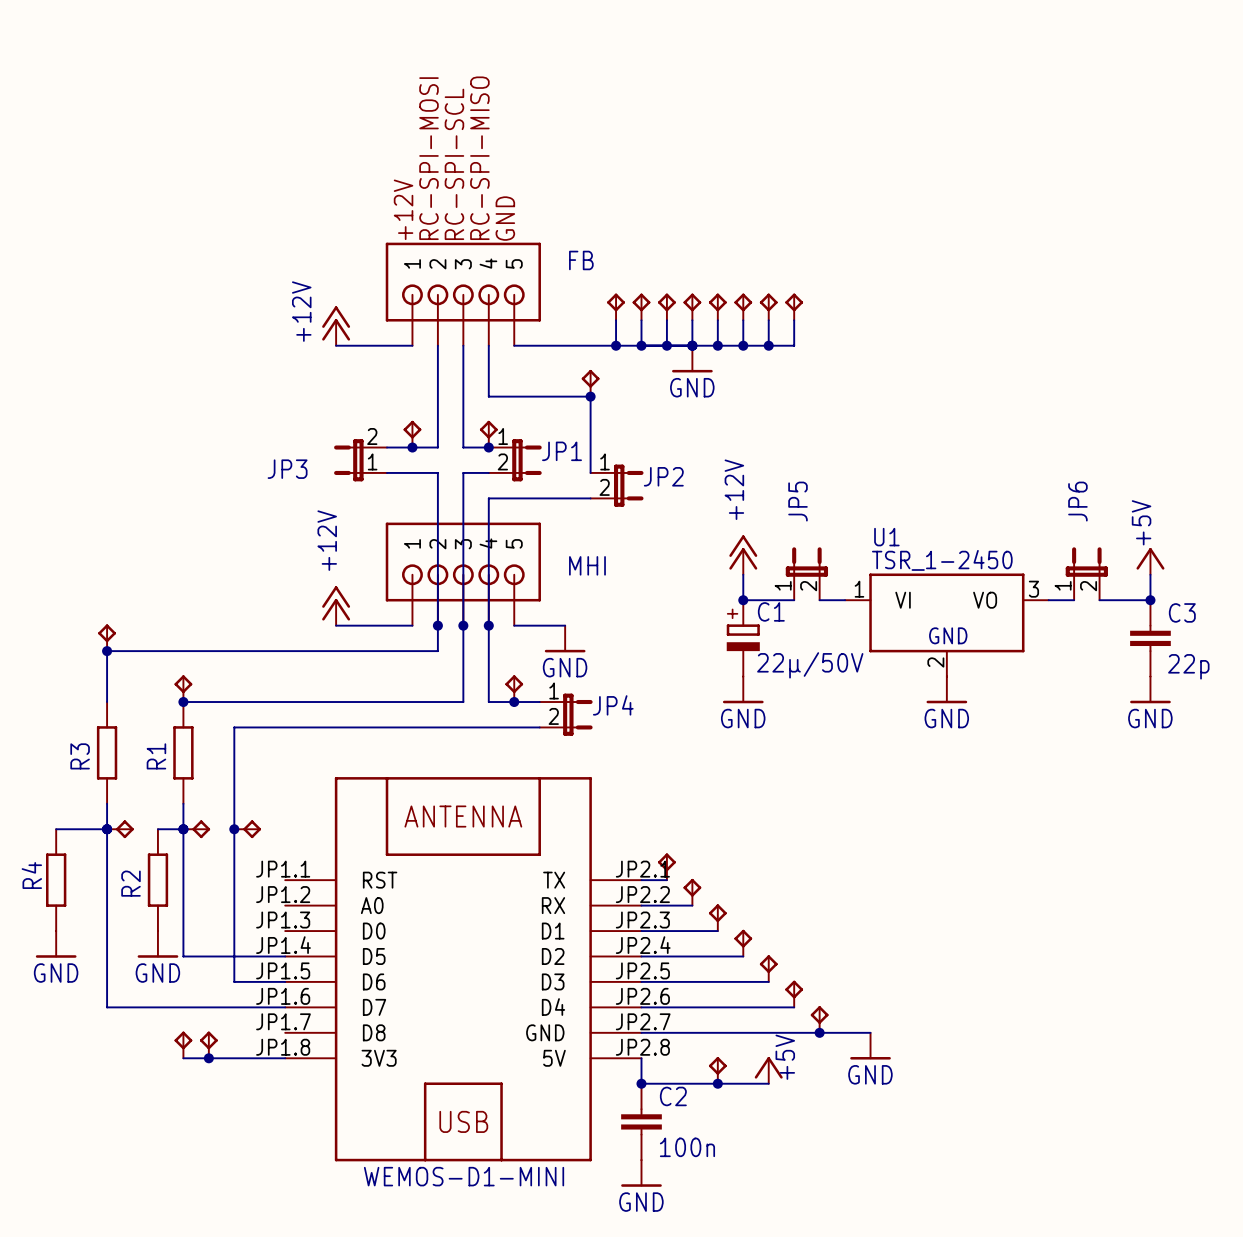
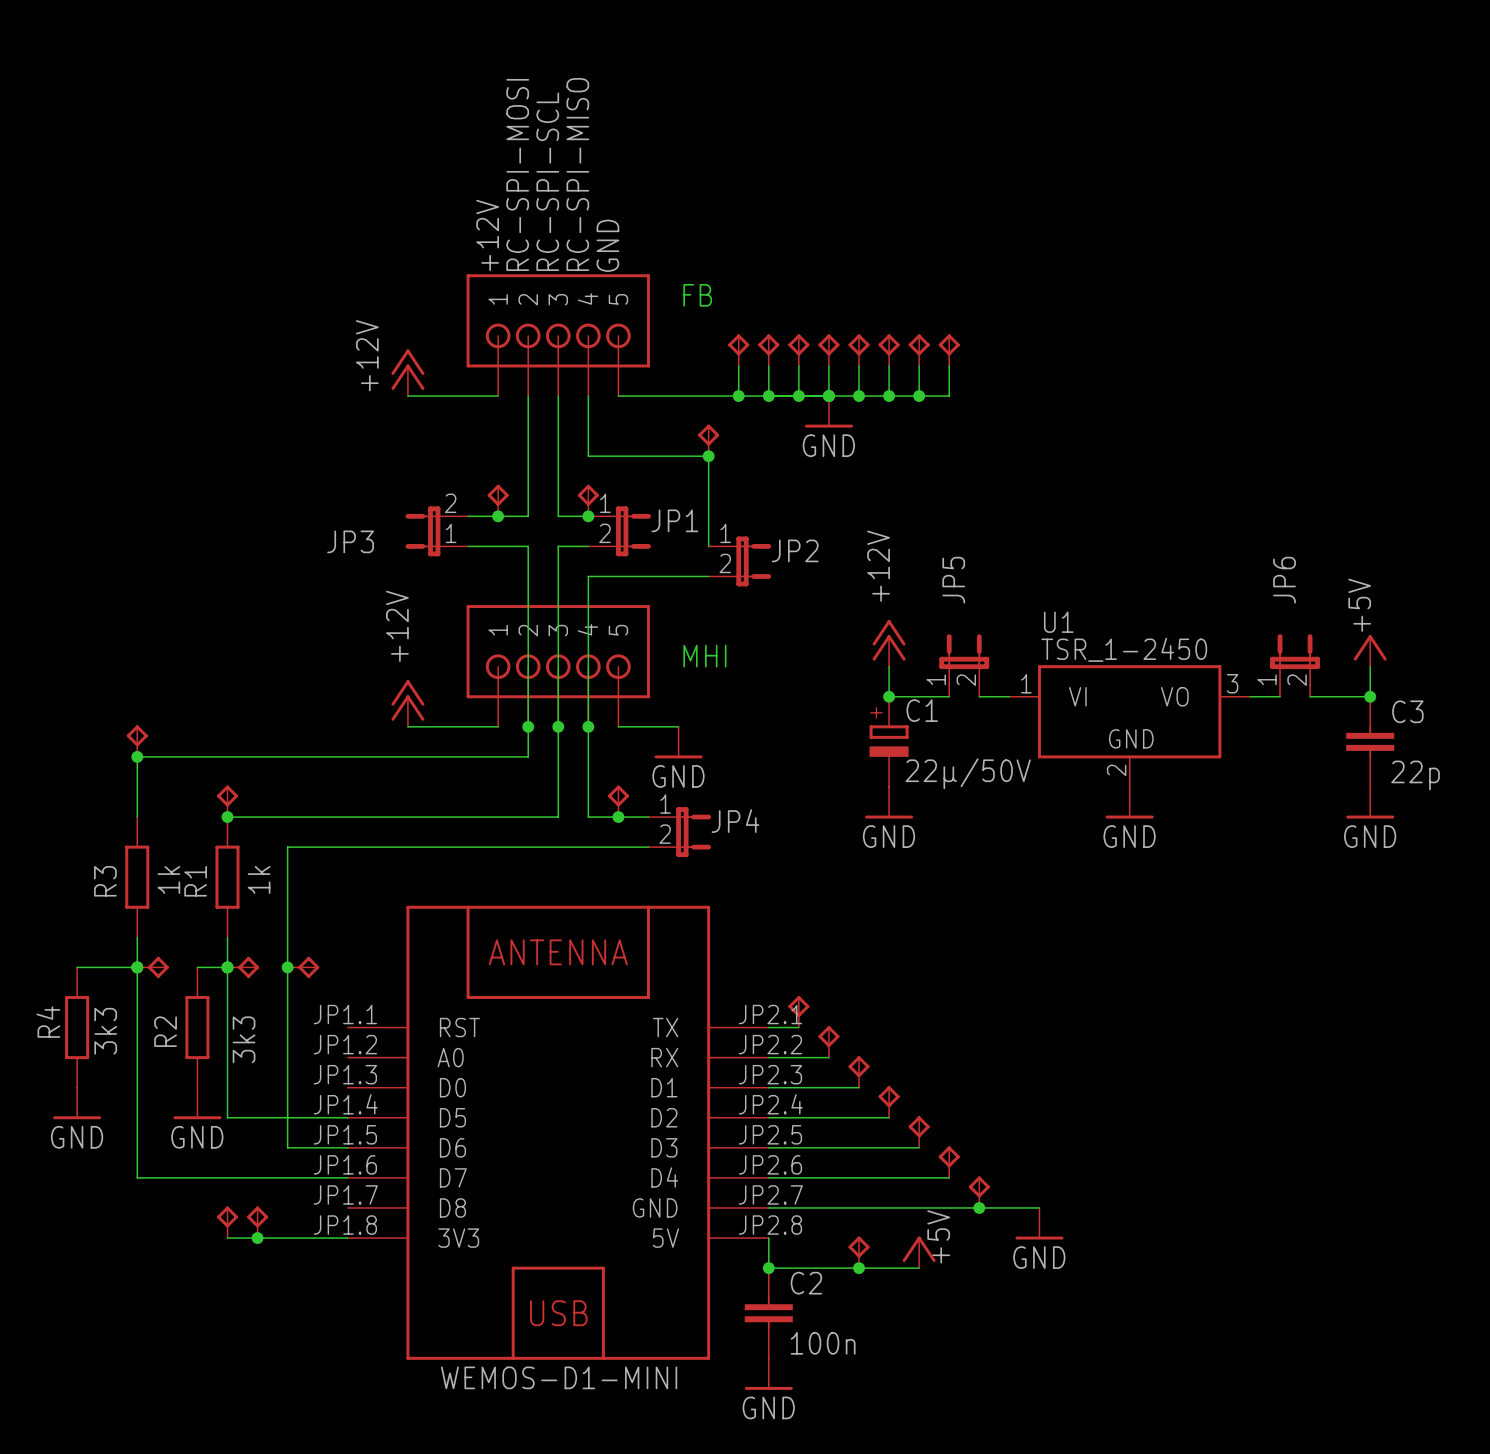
R3 value: none -> 1k (168, 879)
R1 value: none -> 1k (259, 879)
R4 value: none -> 3k3 (105, 1031)
R2 value: none -> 3k3 (244, 1039)

